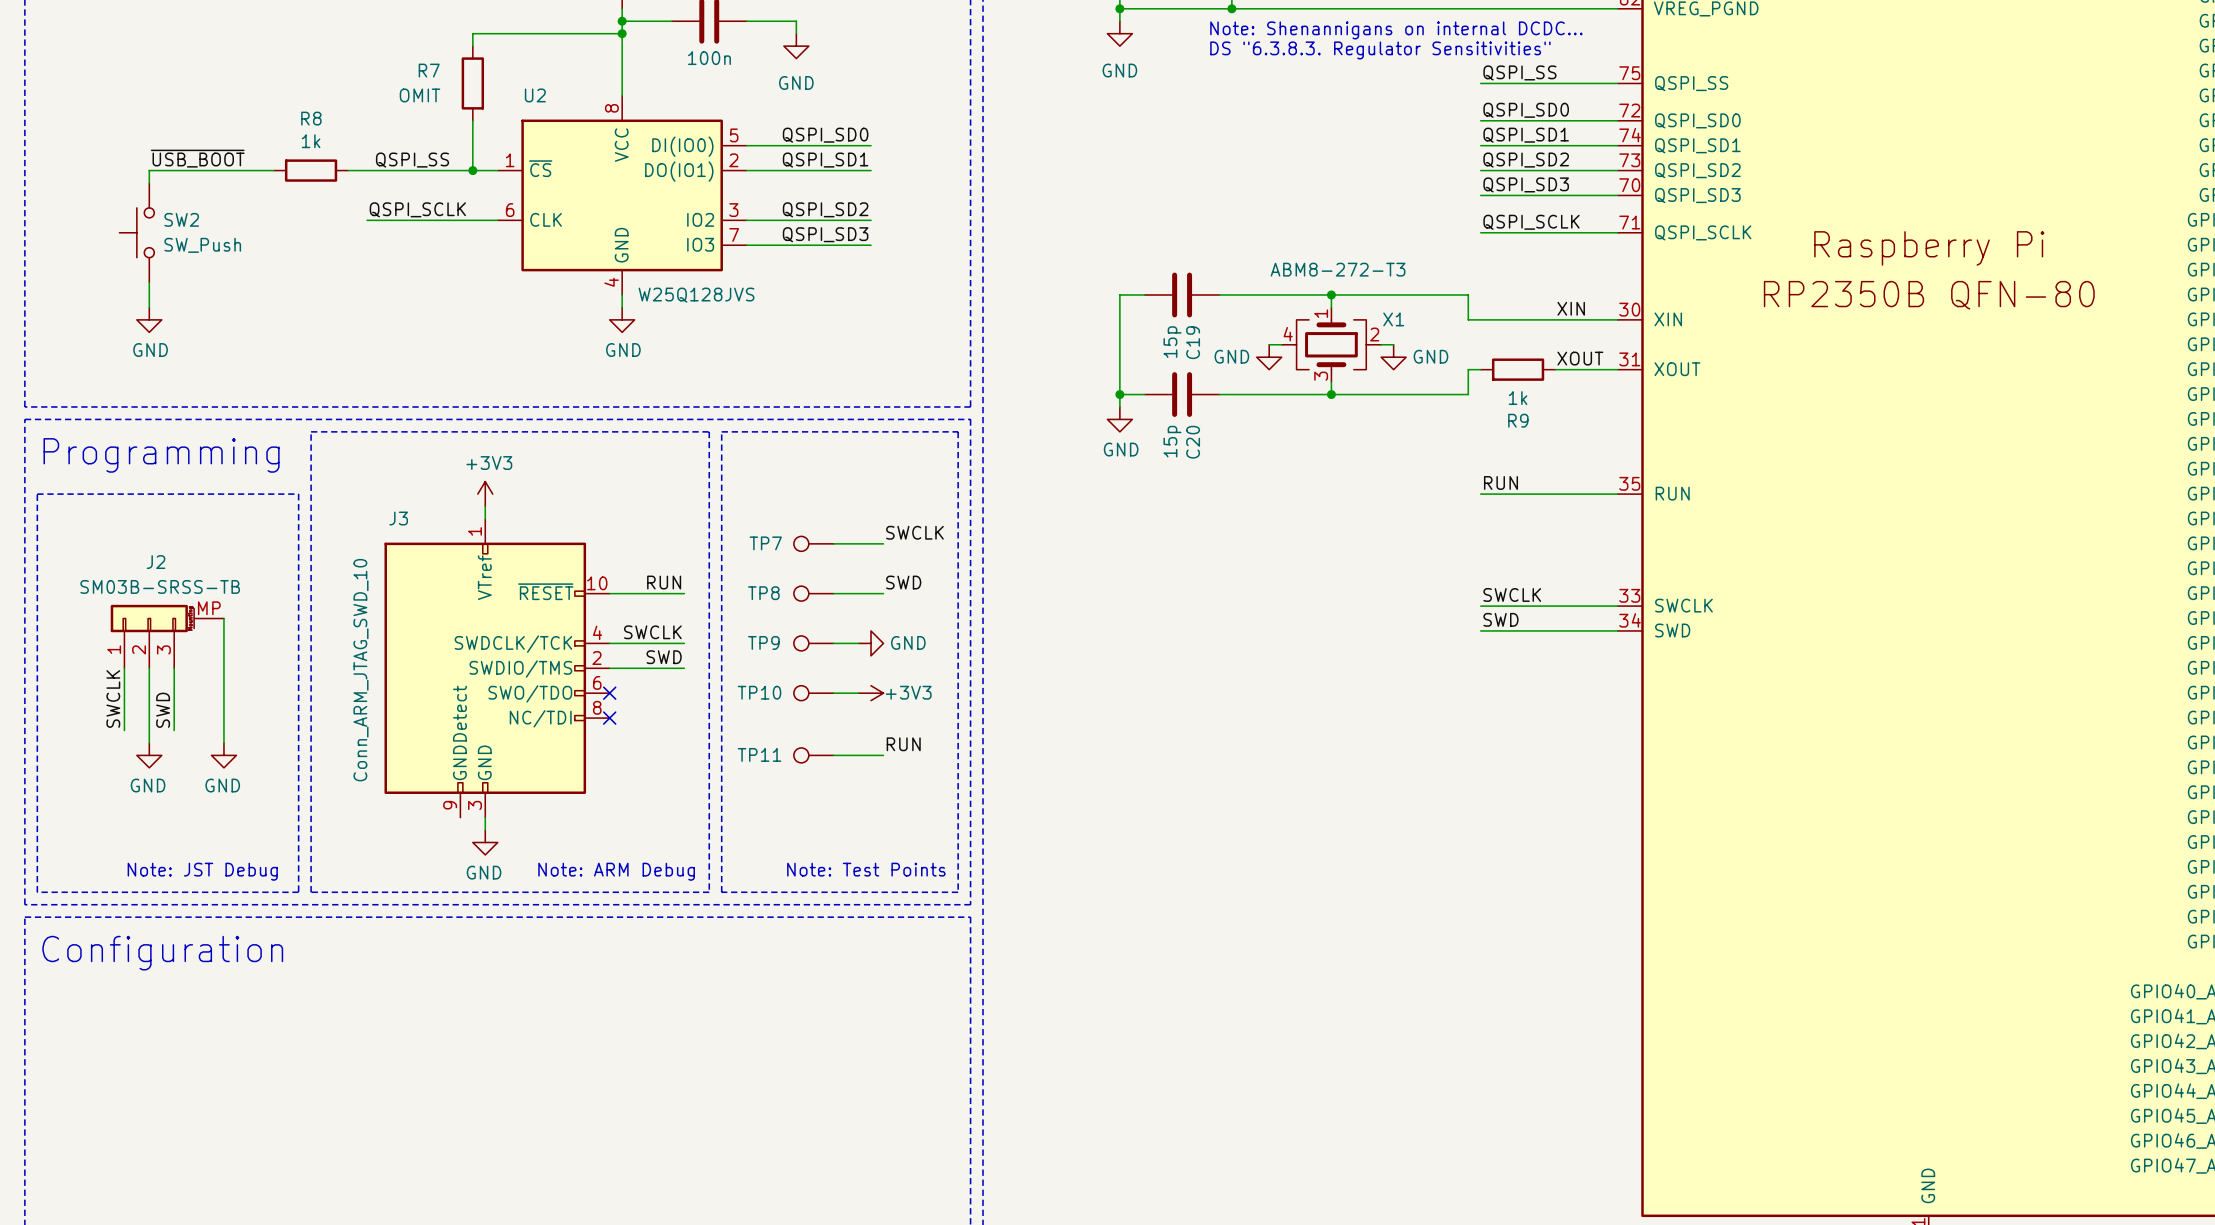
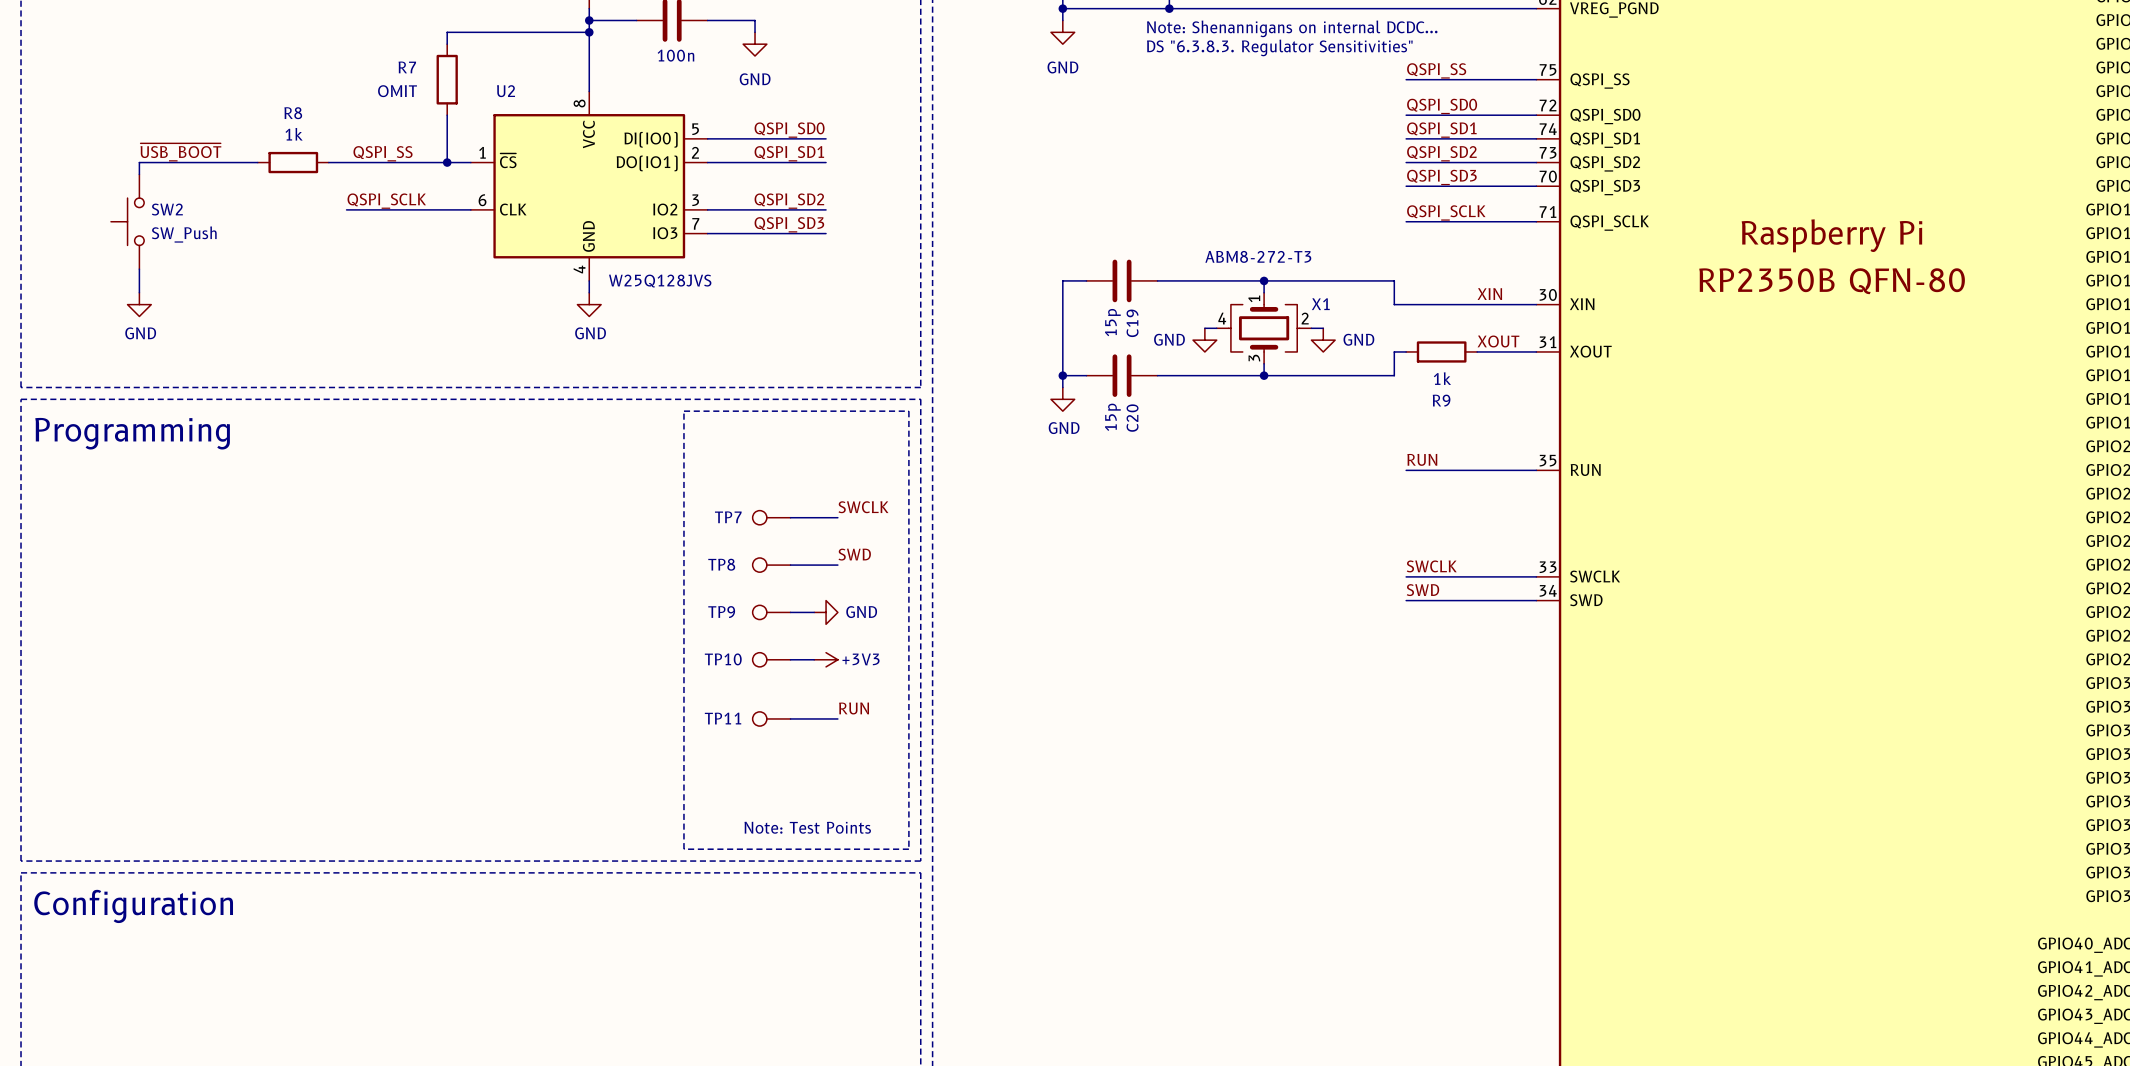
line: (311, 431) (709, 431) (709, 892) (311, 892) (311, 431) -> none
line: (37, 494) (298, 494) (298, 892) (37, 892) (37, 494) -> none
power symbol: +3V3 (485, 494) -> none
wire: (485, 506) (485, 518) -> none
label: RUN (664, 582) -> none
wire: (609, 593) (684, 593) -> none
wire: (223, 618) (223, 742) -> none
label: SWCLK (652, 632) -> none
J2: SM03B-SRSS-TB (167, 636) -> none
wire: (609, 643) (684, 643) -> none
label: SWD (664, 657) -> none
wire: (124, 668) (124, 730) -> none
wire: (149, 668) (149, 742) -> none
wire: (174, 668) (174, 730) -> none
J3: Conn_ARM_JTAG_SWD_10 (497, 668) -> none
wire: (609, 668) (684, 668) -> none
no-connect mark: (609, 693) -> none
label: SWCLK (113, 699) -> none
label: SWD (163, 710) -> none
no-connect mark: (609, 718) -> none
power symbol: GND (149, 755) -> none
power symbol: GND (223, 755) -> none
wire: (485, 817) (485, 830) -> none
power symbol: GND (485, 842) -> none
text: Note: JST Debug (202, 871) -> none
text: Note: ARM Debug (616, 871) -> none

